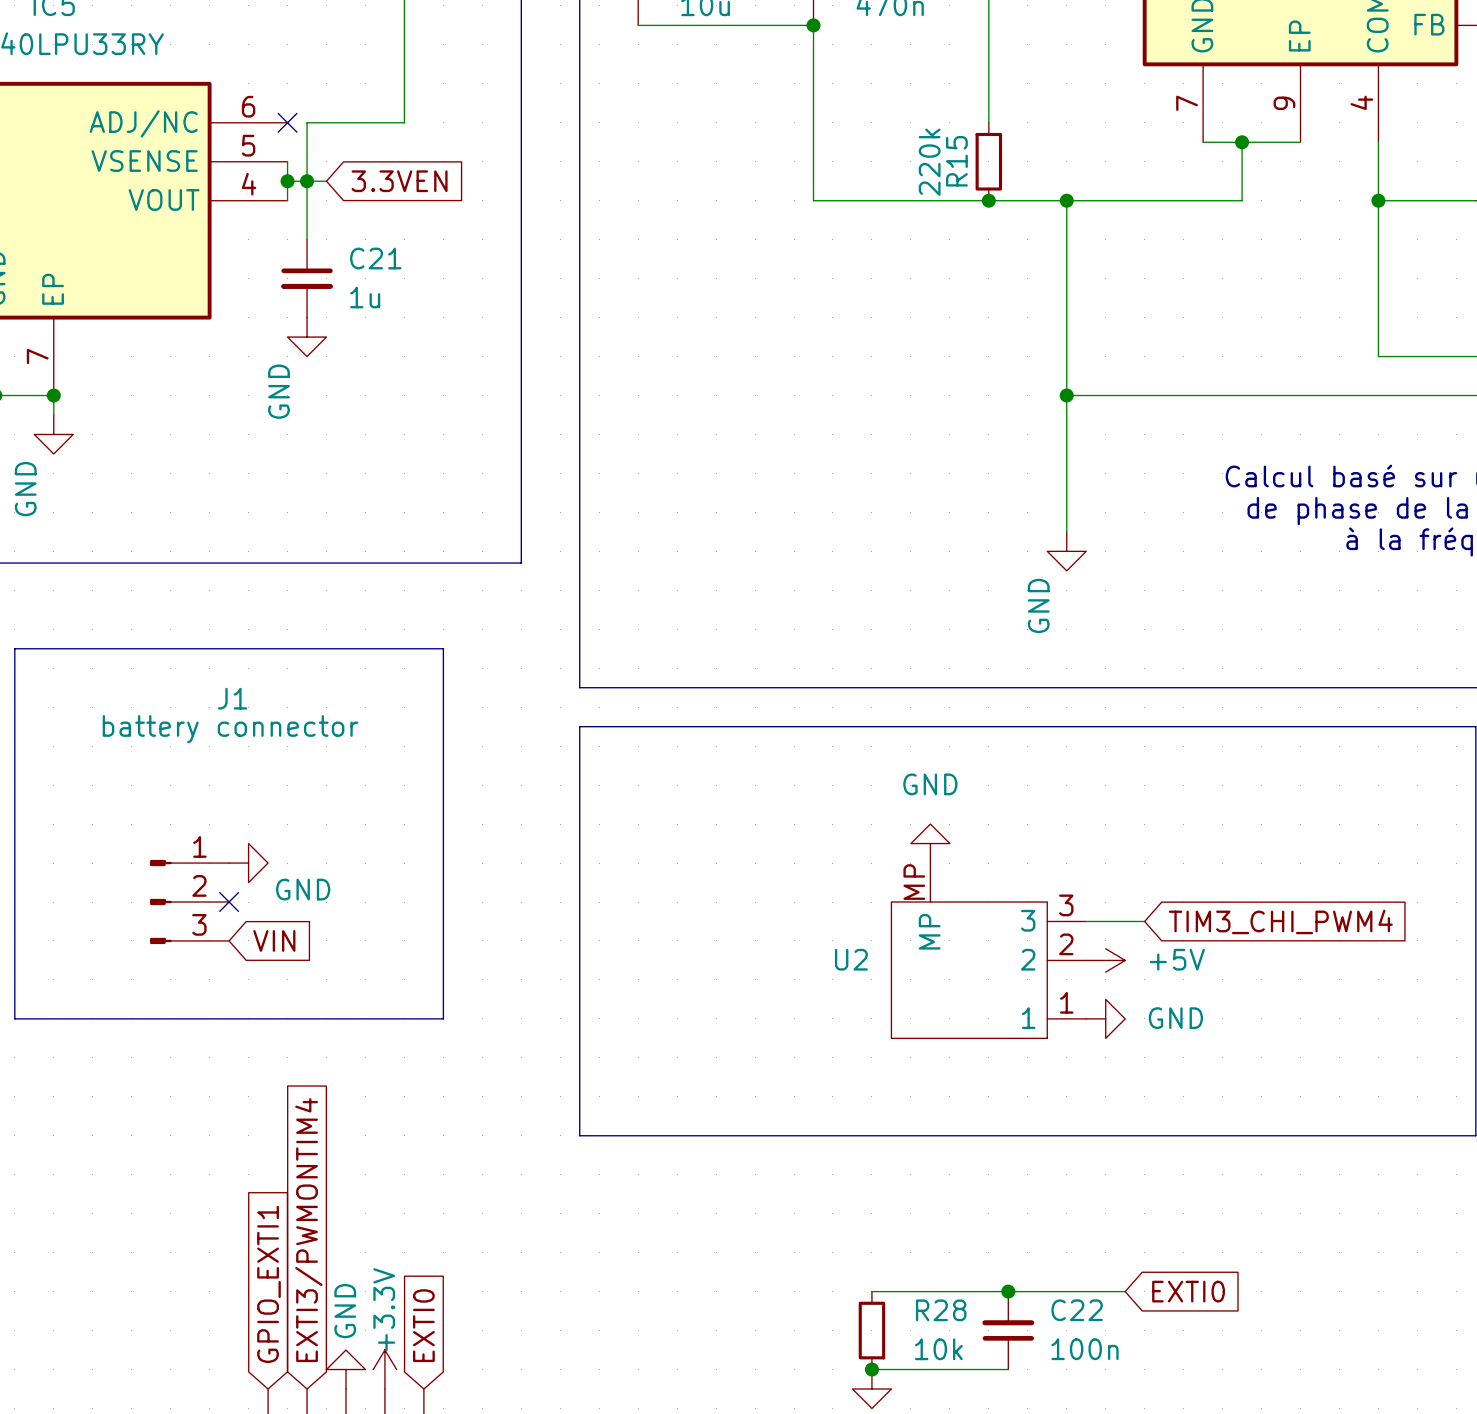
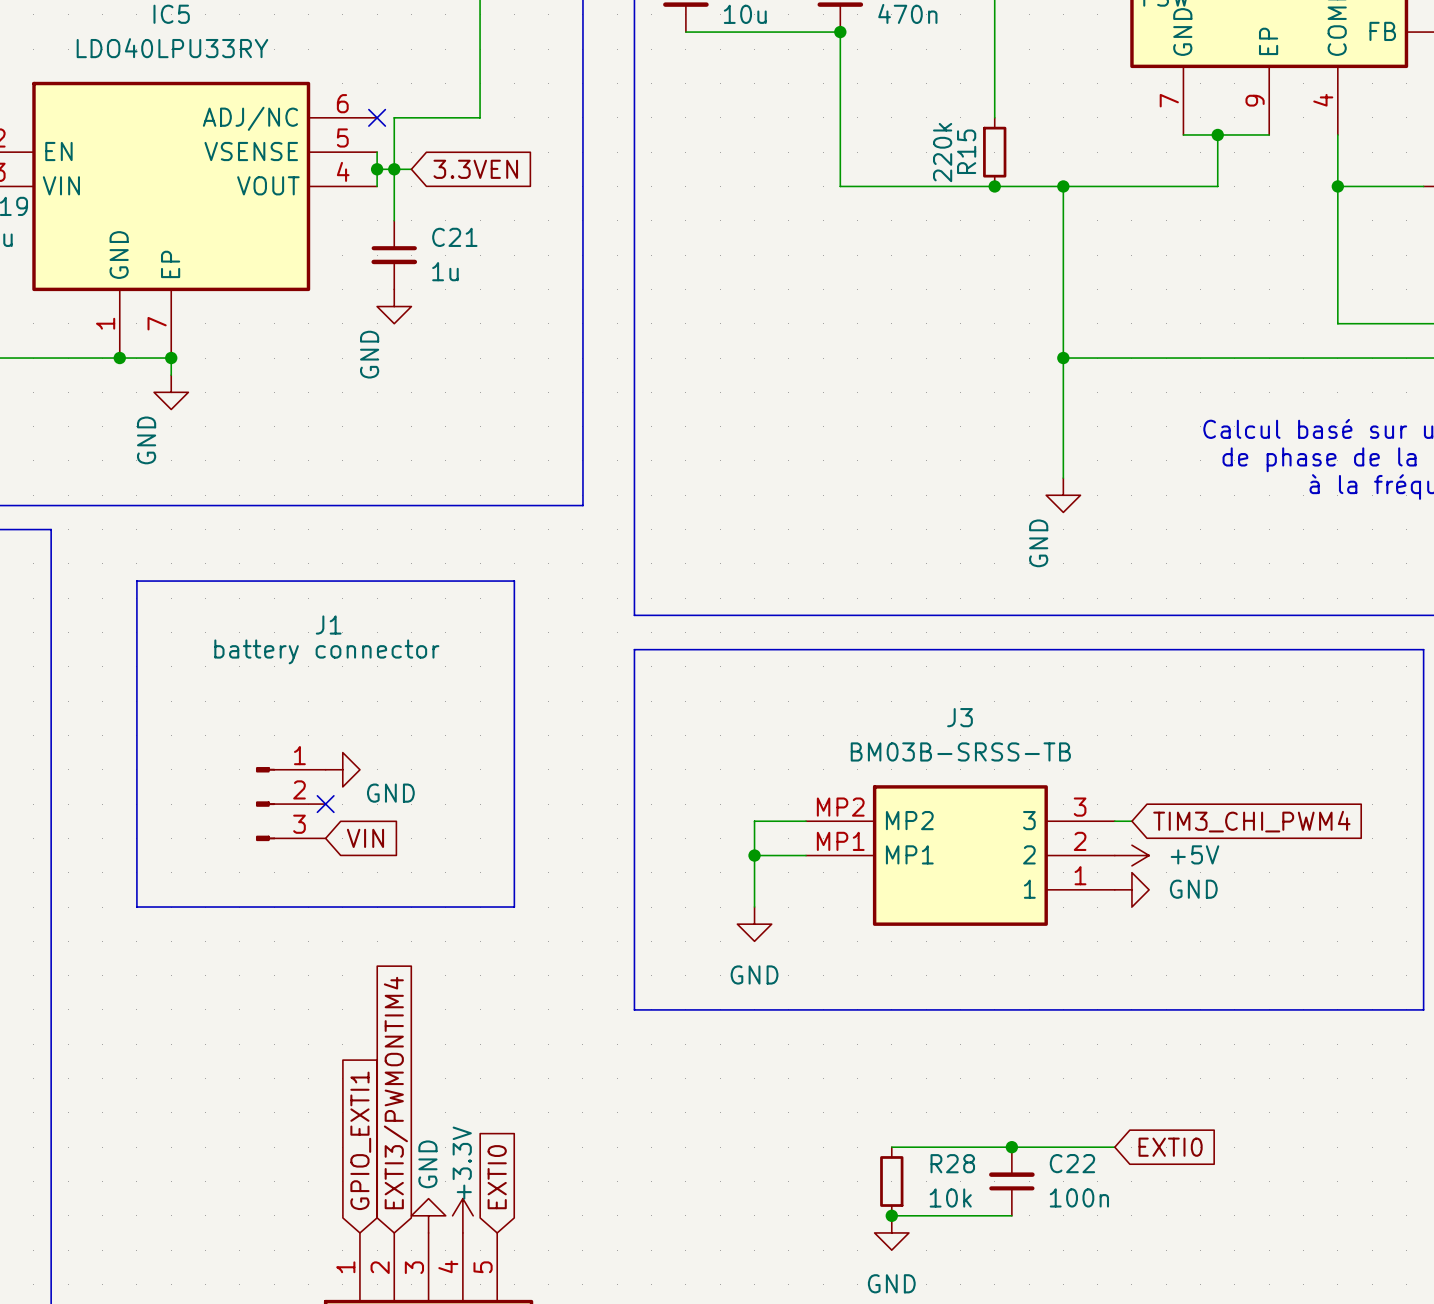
power symbol: GND (930, 843) -> none
wire: none -> (806, 821) (754, 821) (754, 907)
U2: (988, 950) -> none
wire: none -> (754, 855) (806, 855)
junction: none -> (754, 855)
J3: none -> BM03B-SRSS-TB (960, 855)
power symbol position: +5V (1105, 960) -> +5V (1131, 855)
power symbol position: GND (1105, 1018) -> GND (1131, 889)
power symbol: none -> GND (754, 924)

